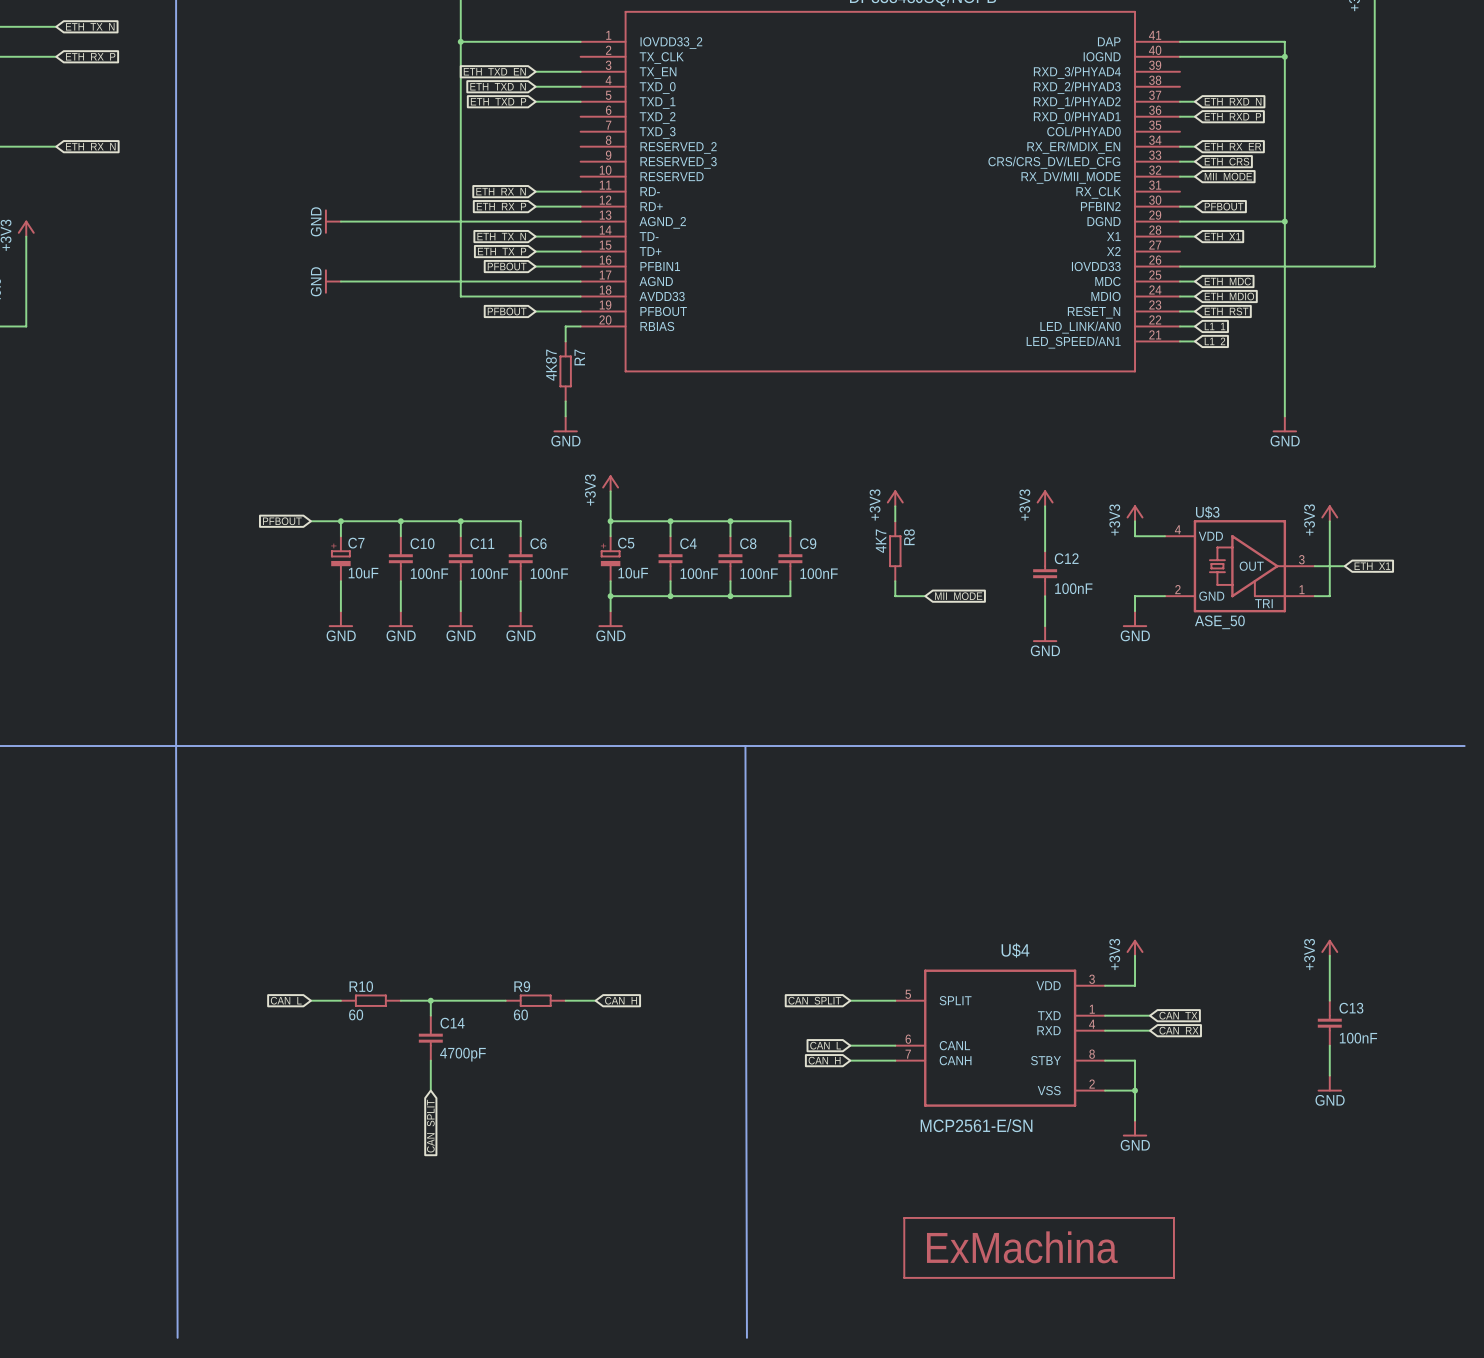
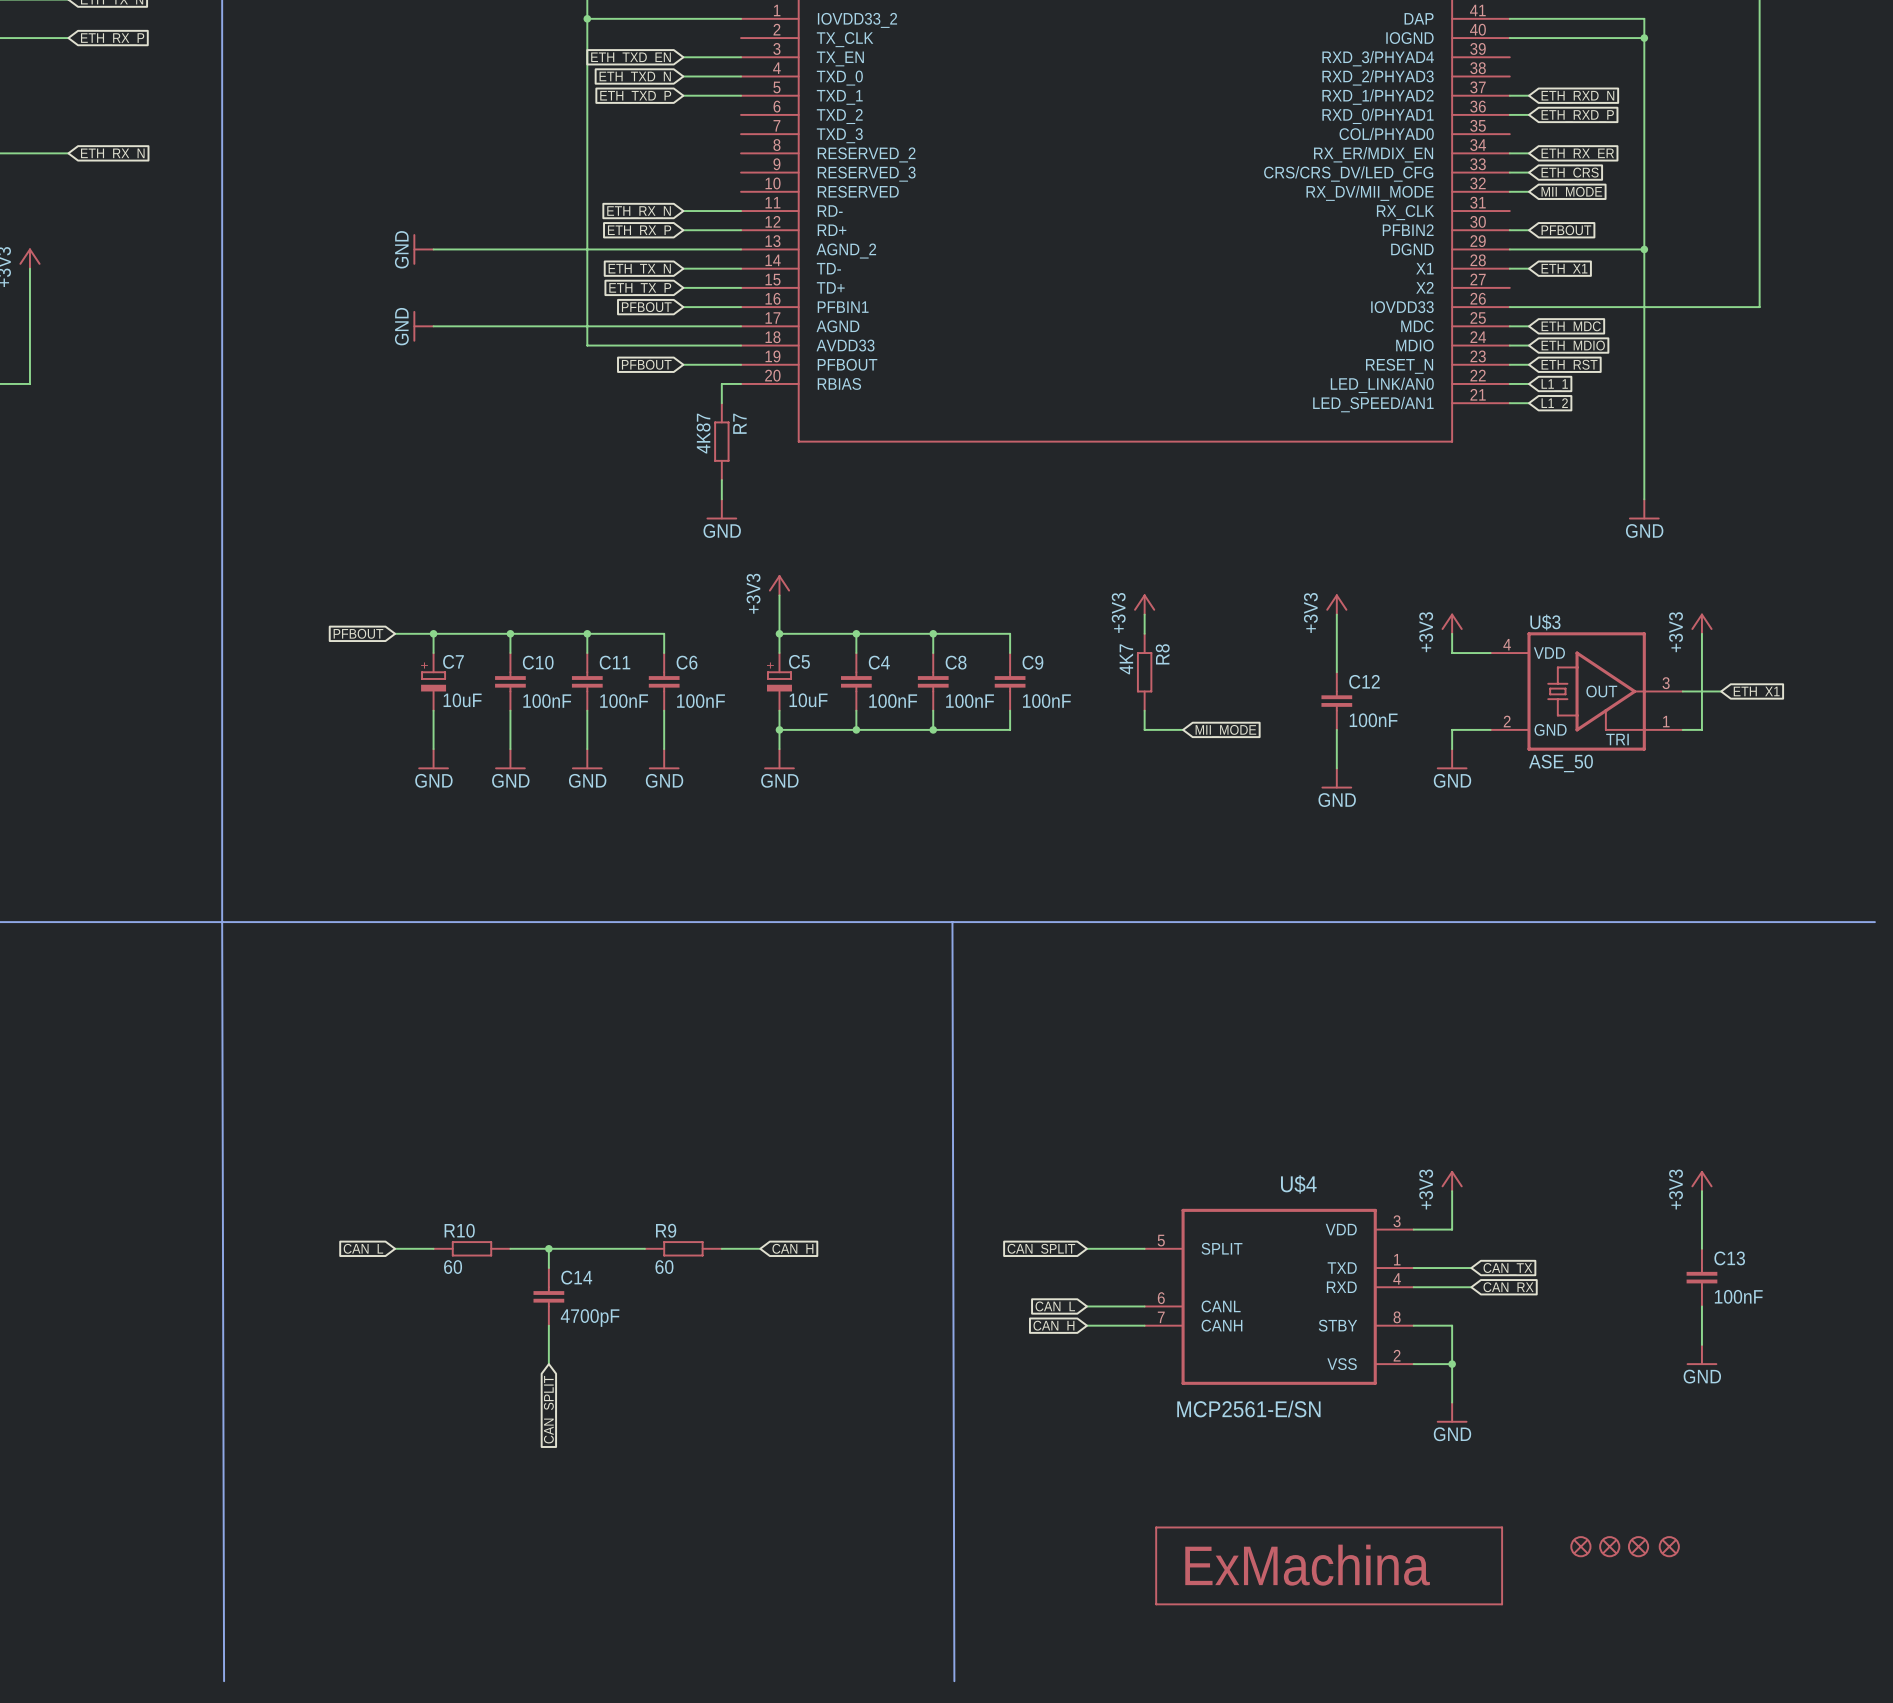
part: none -> (1580, 1546)
part: none -> (1609, 1546)
part: none -> (1638, 1546)
part: none -> (1669, 1546)

